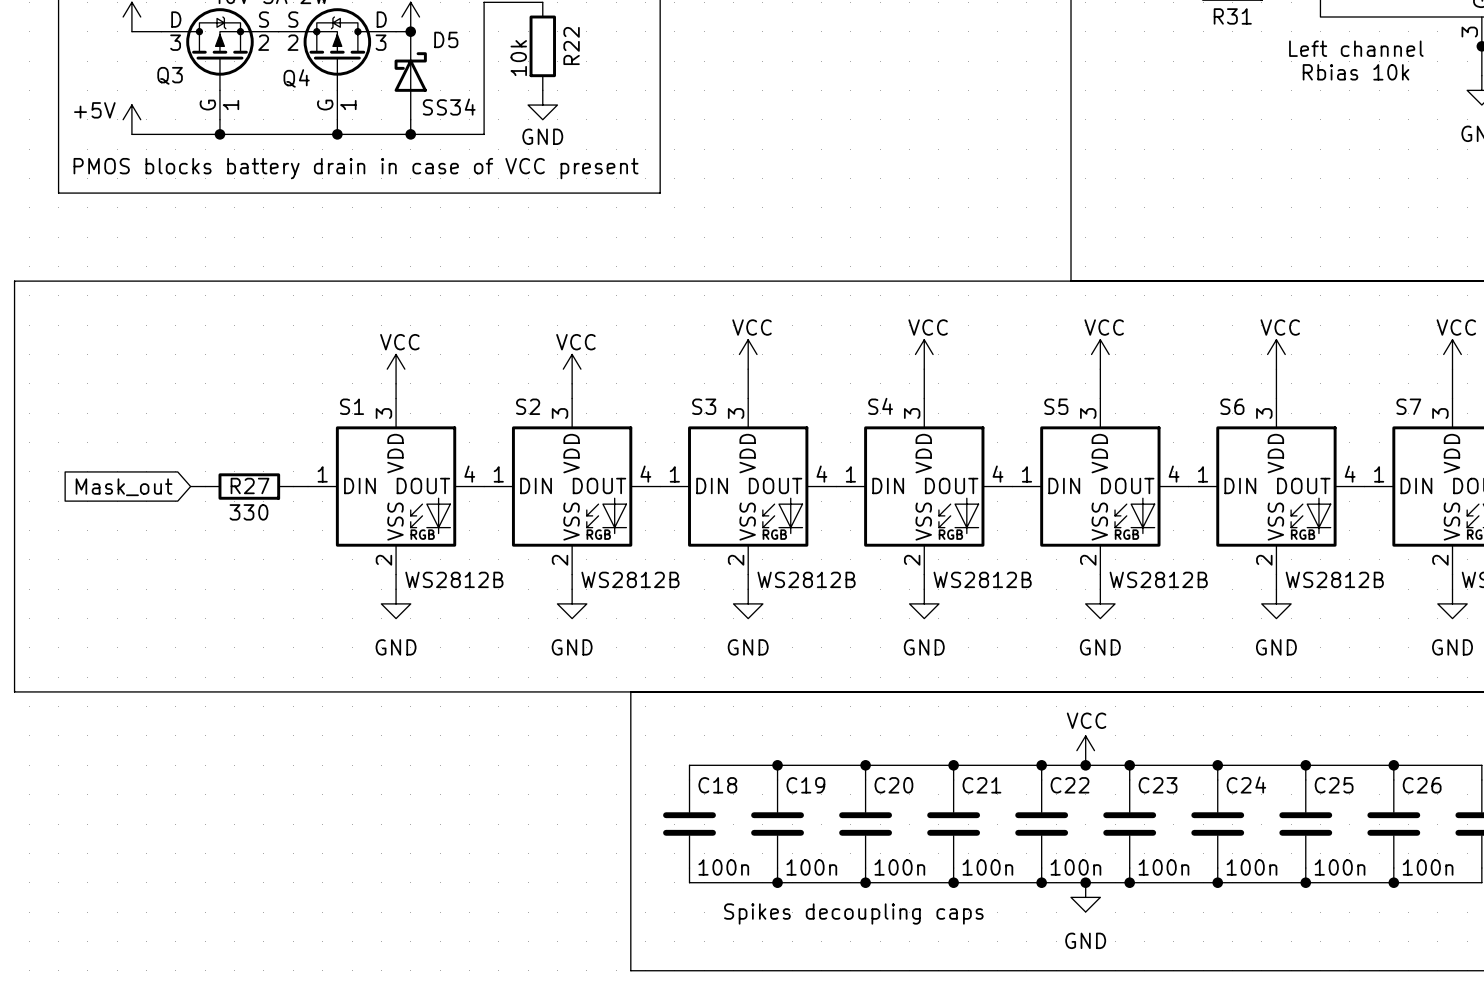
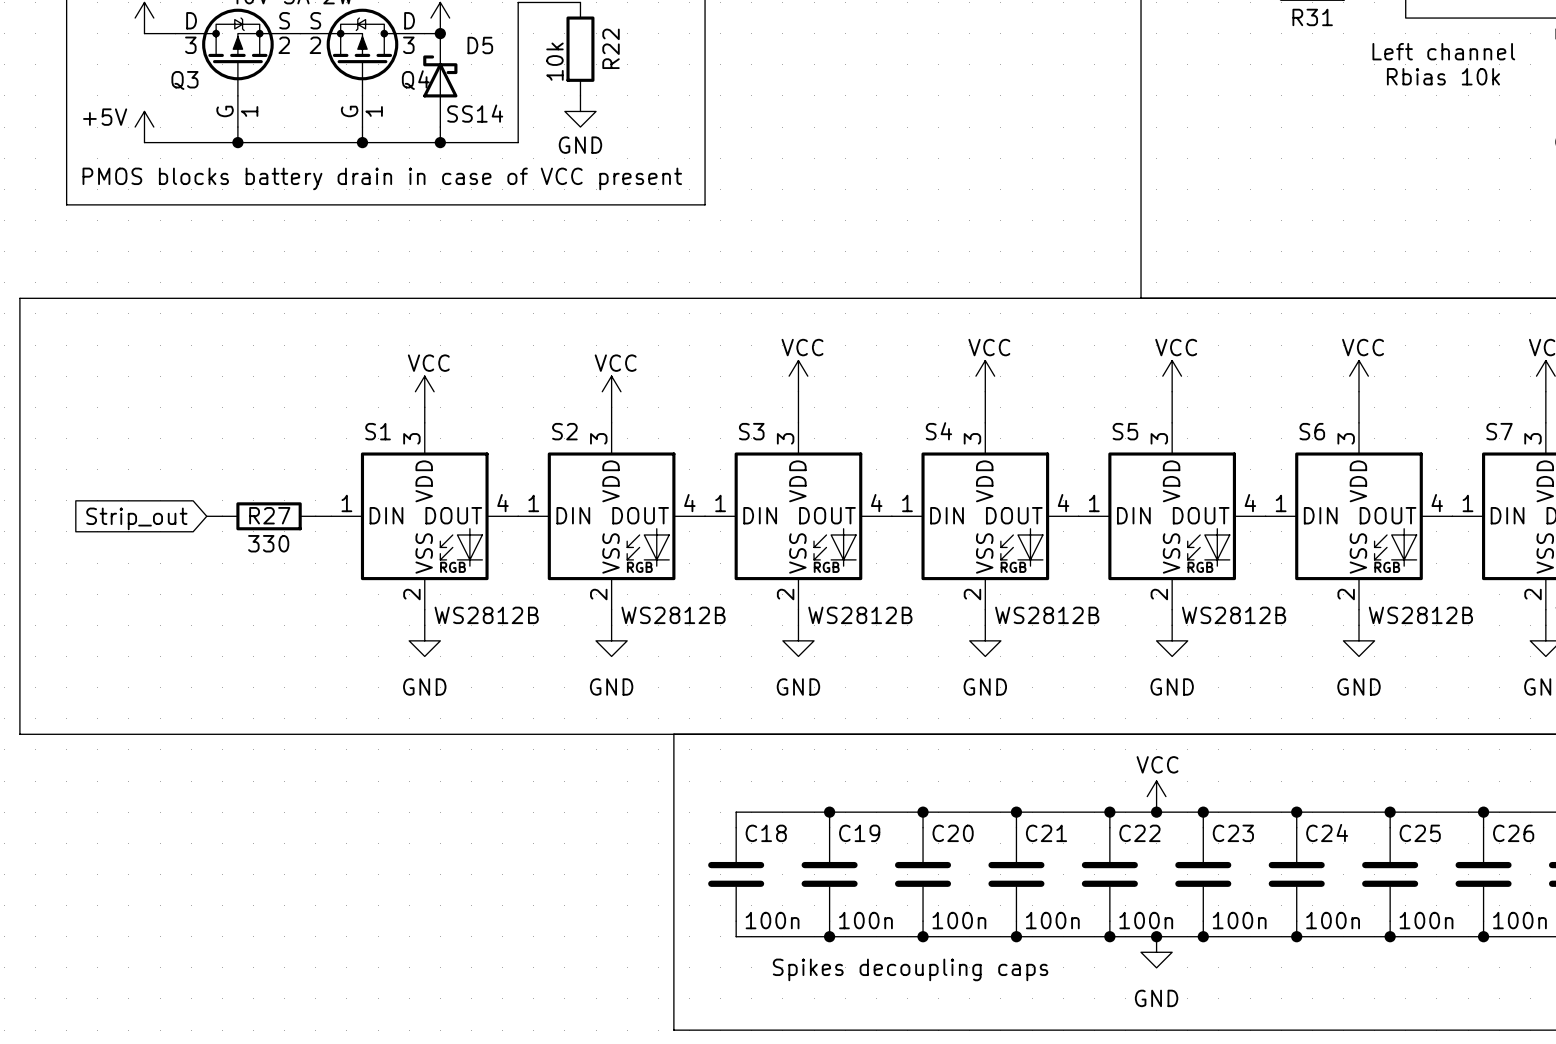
D5 flip: as is (410, 72) -> left-right (440, 76)
Q4 name position: Q4 (296, 78) -> Q4 (415, 80)
D5 value: SS34 (449, 107) -> SS14 (475, 113)
global label: Mask_out (124, 487) -> Strip_out (136, 518)

